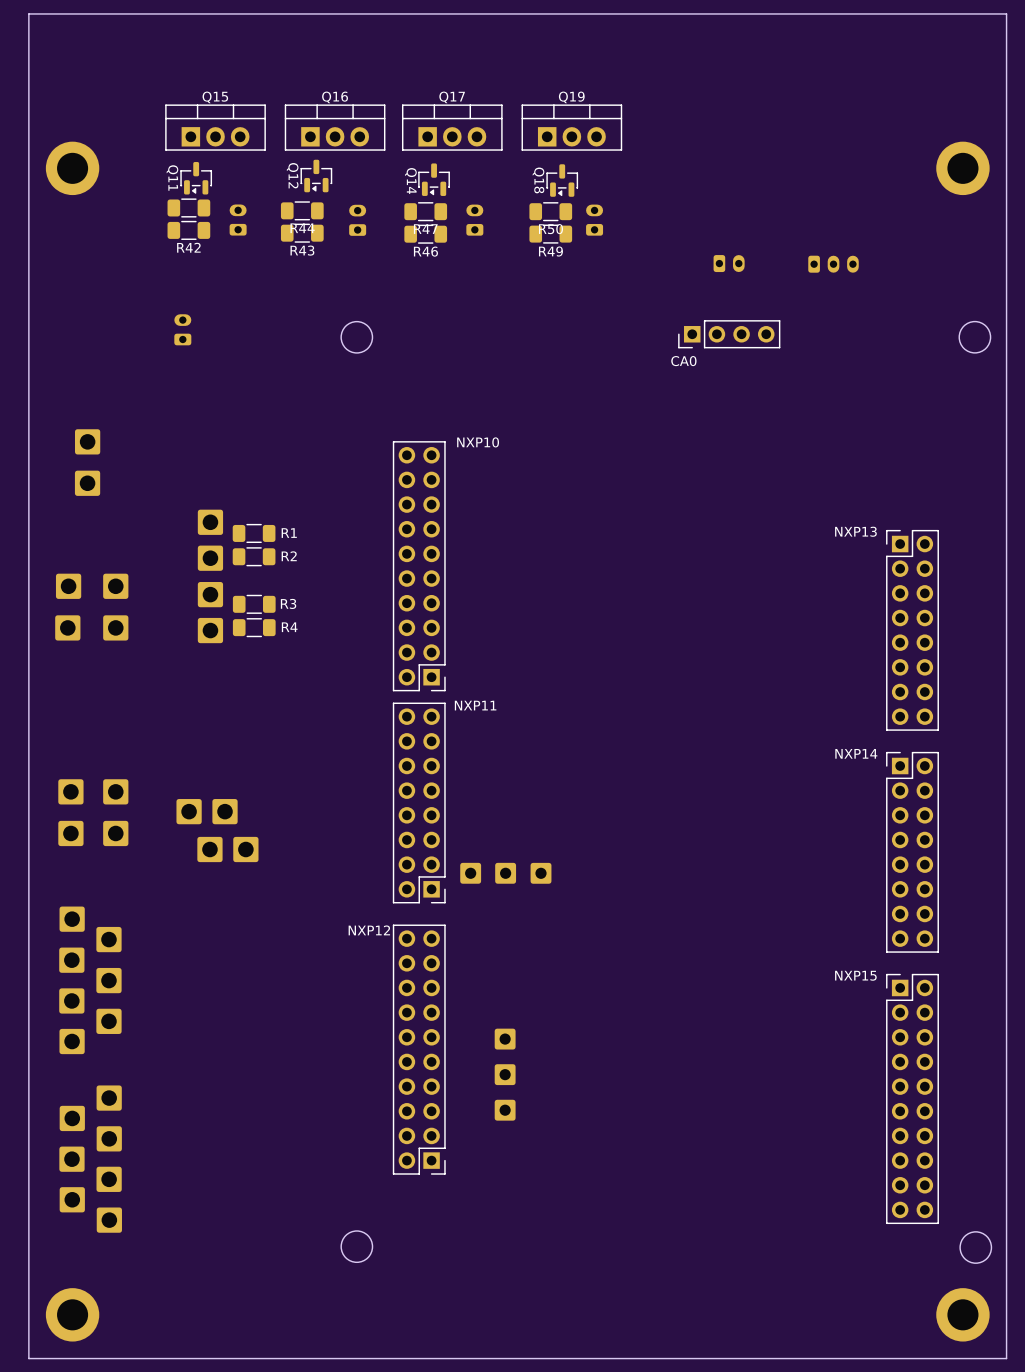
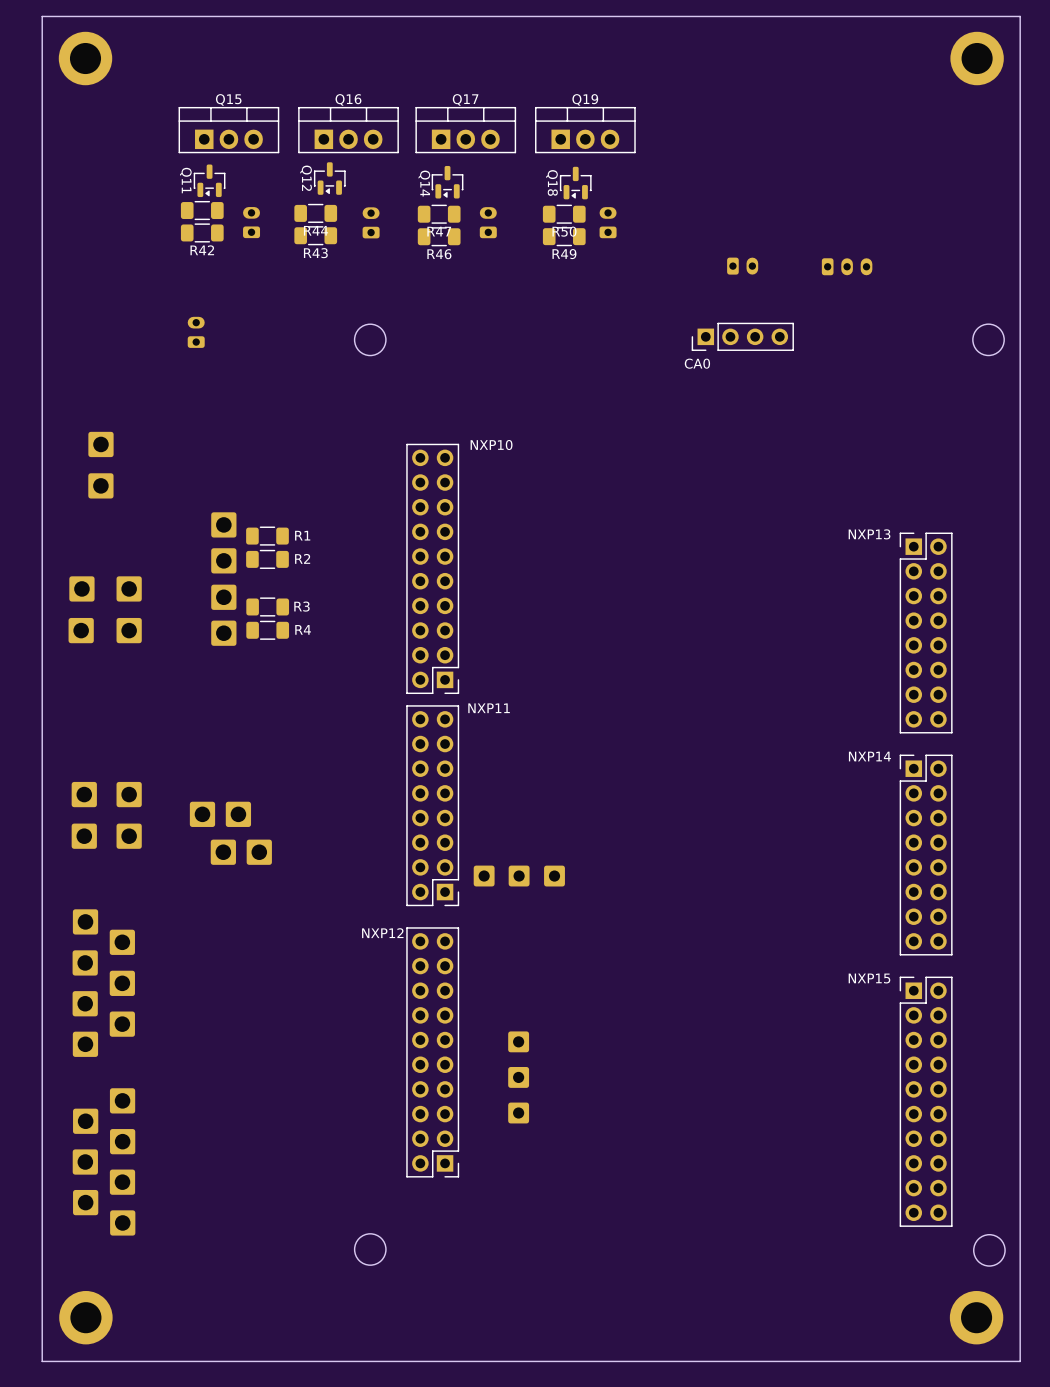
part position: (72, 168) -> (85, 58)
part position: (962, 168) -> (977, 58)

